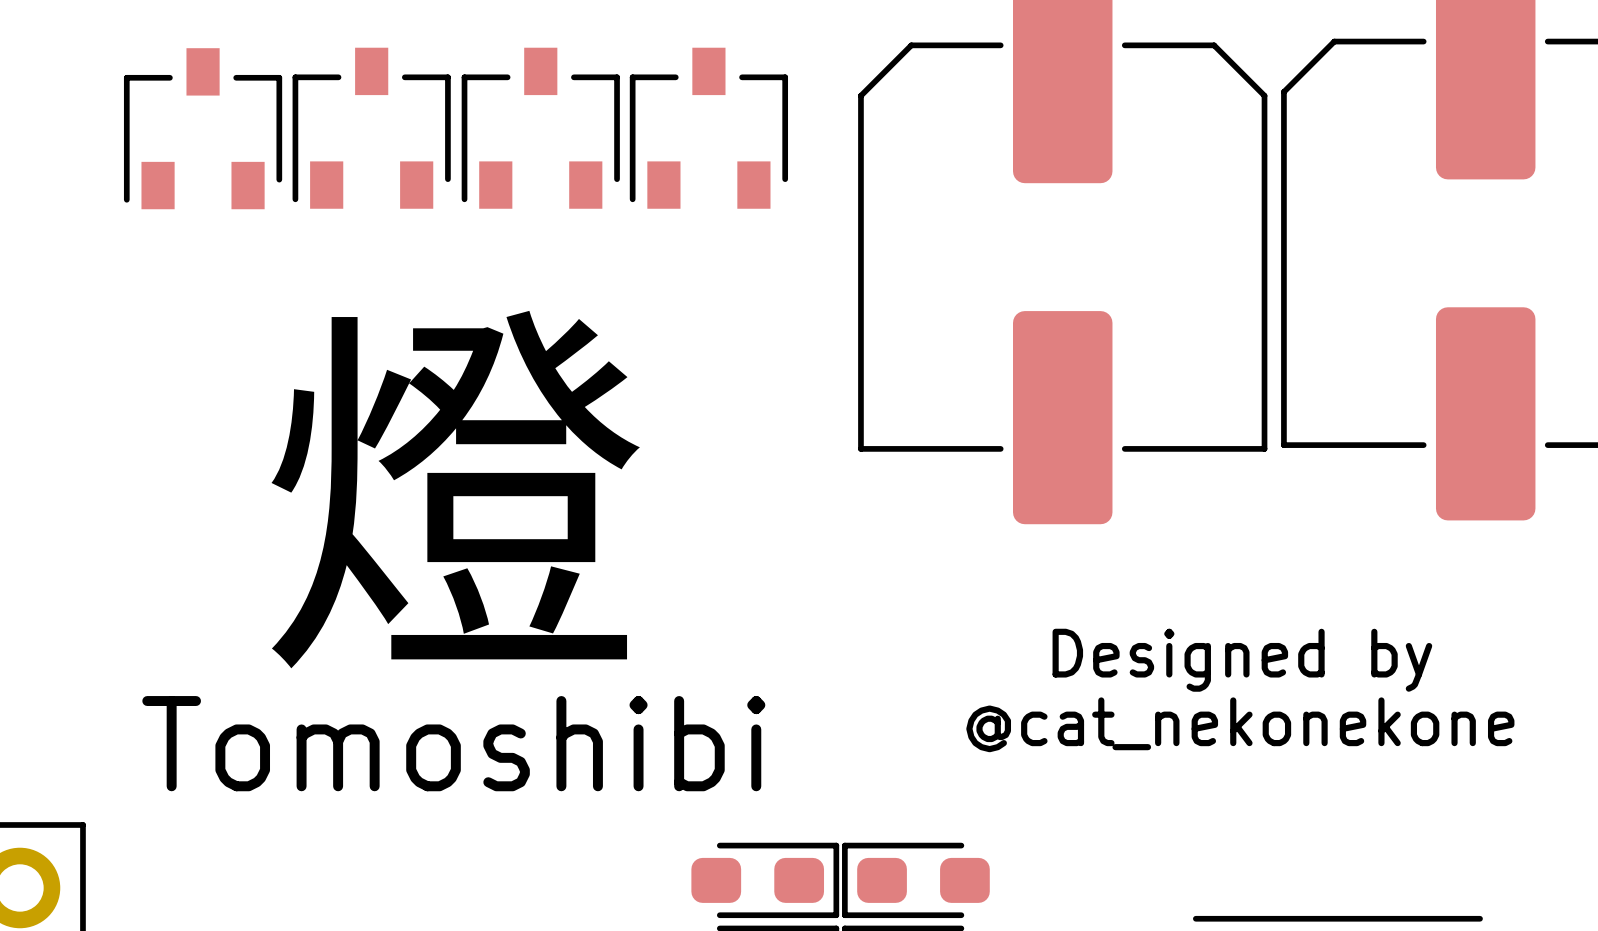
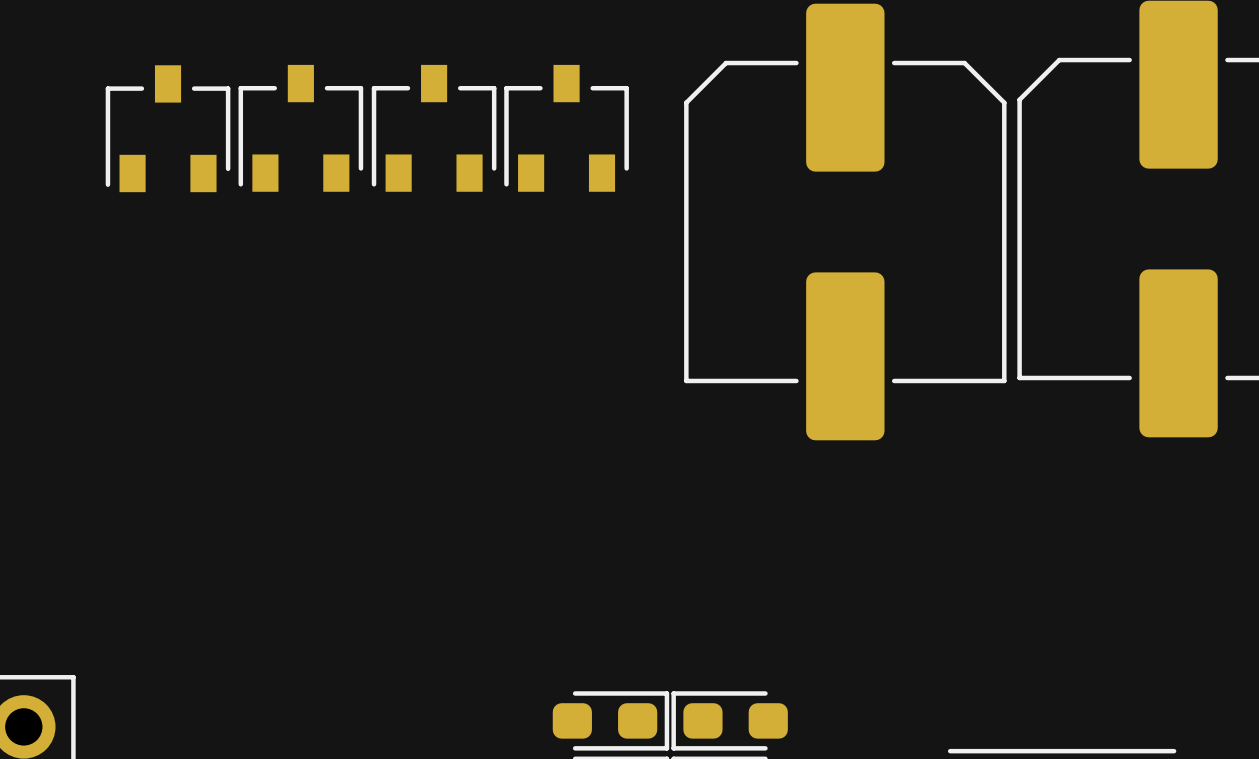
text: 燈 (455, 489) -> none
text: Designed by (1242, 660) -> none
text: @cat_nekonekone (1240, 724) -> none
text: Tomoshibi (453, 743) -> none

